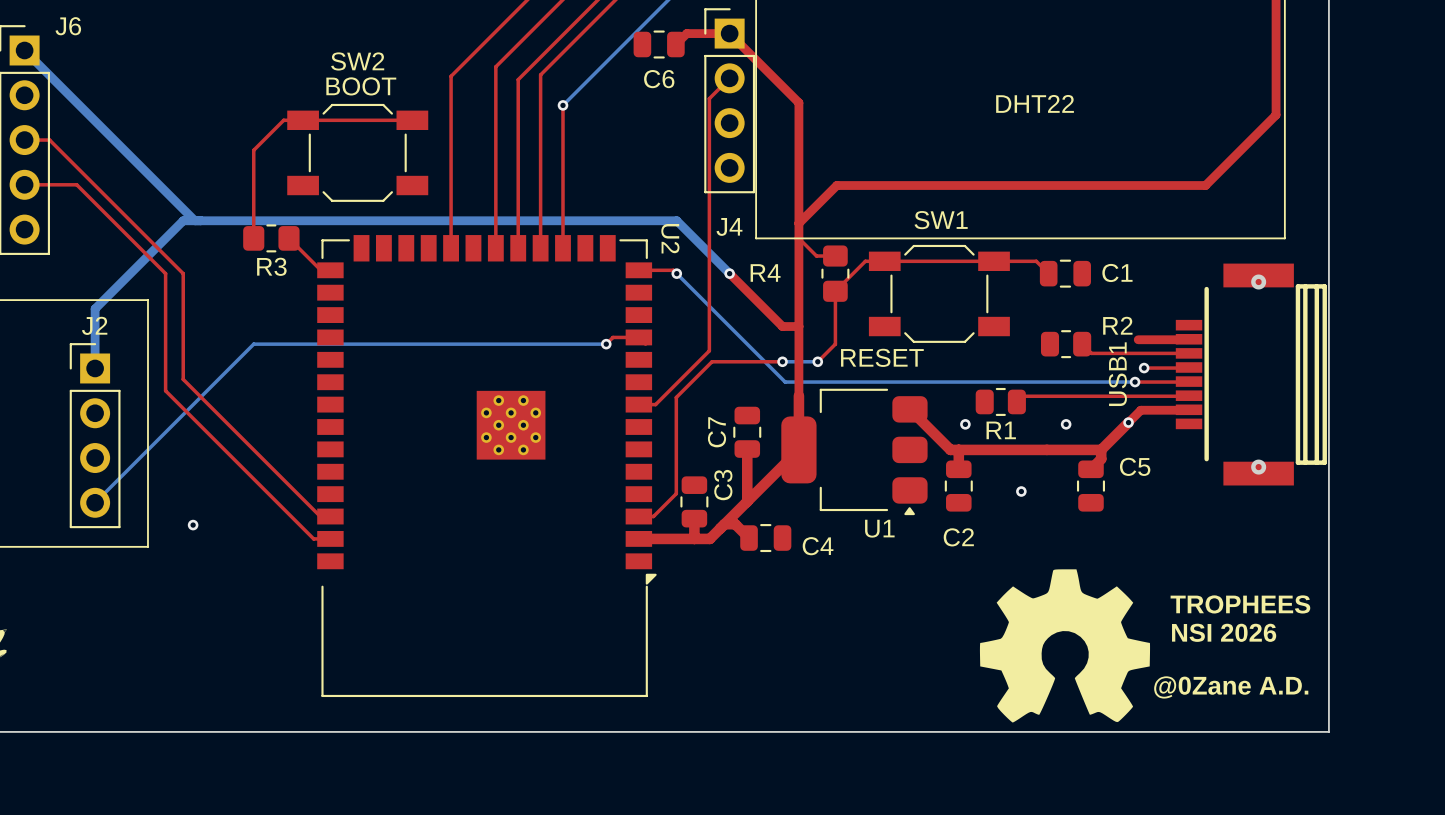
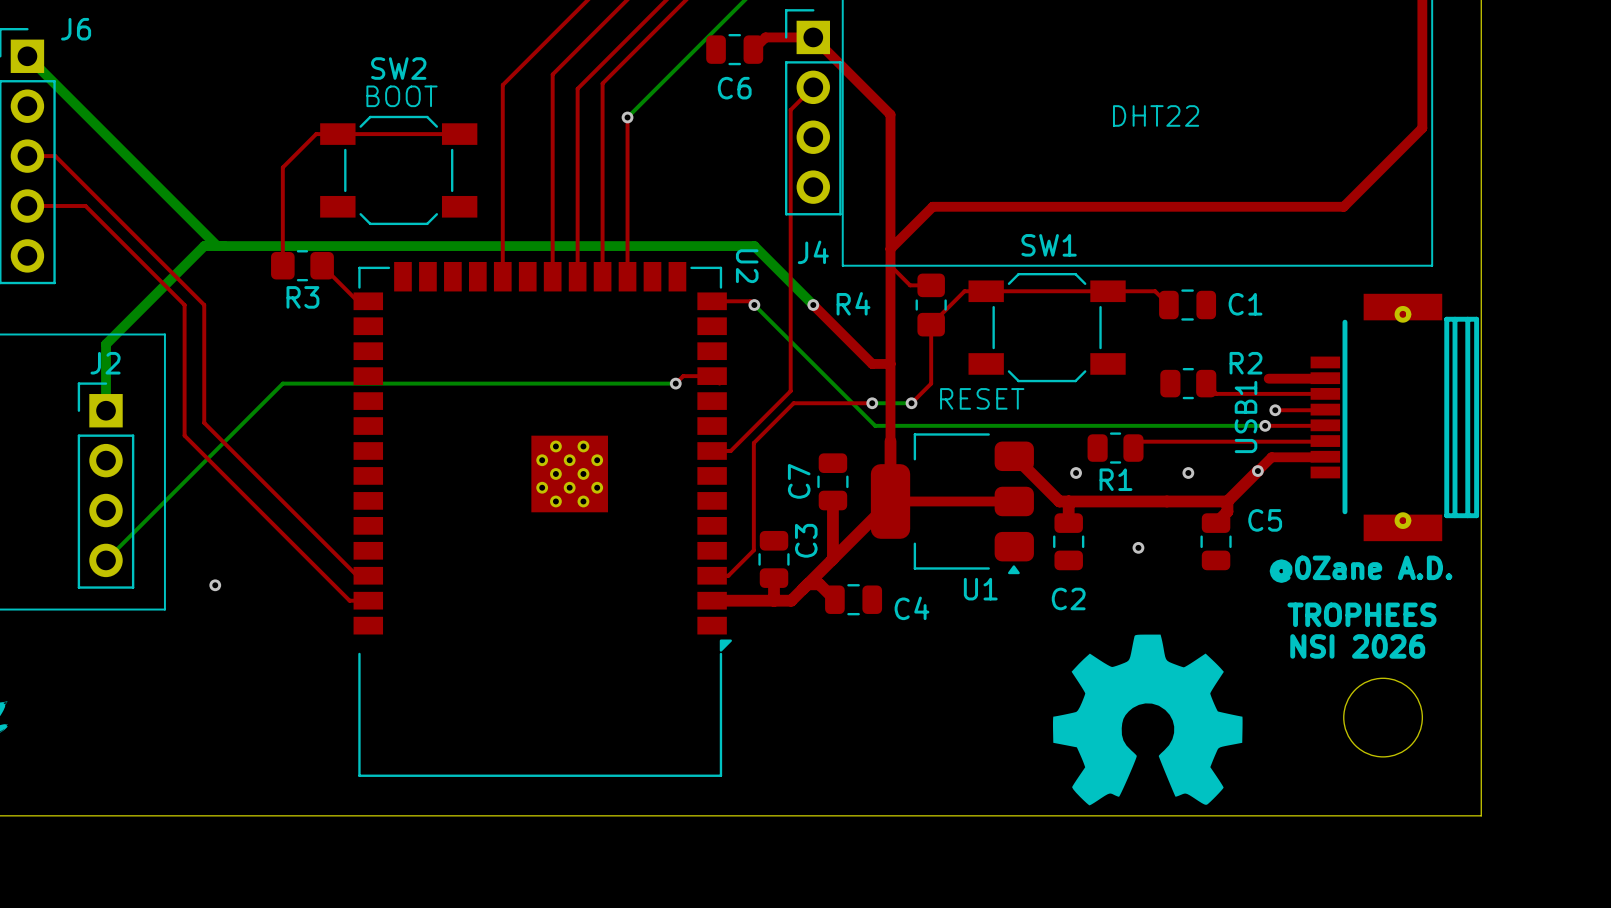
top track: none -> (890, 501) (1014, 501)
text position: TROPHEES (1240, 604) -> TROPHEES (1361, 614)
round board edge: none -> [1343, 677, 1423, 758]
text position: NSI 2026 (1224, 632) -> NSI 2026 (1357, 646)
drawing position: (1064, 645) -> (1147, 719)
text position: @0Zane A.D. (1231, 687) -> @0Zane A.D. (1361, 569)

